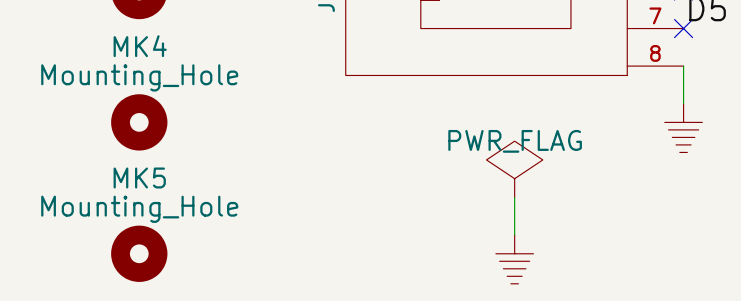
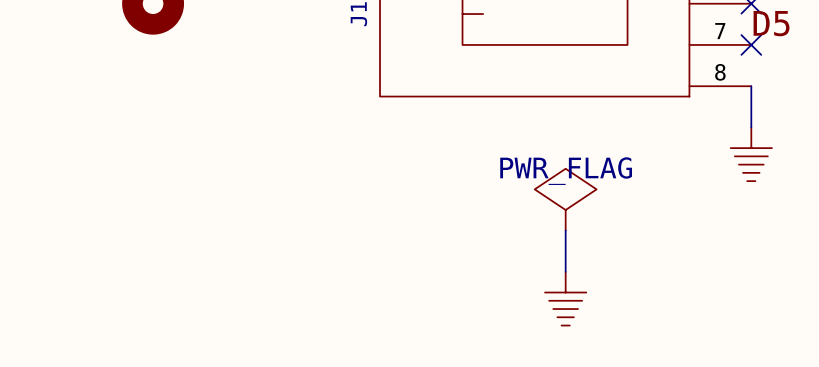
MK4: Mounting_Hole (139, 122) -> none
MK5: Mounting_Hole (139, 253) -> none

